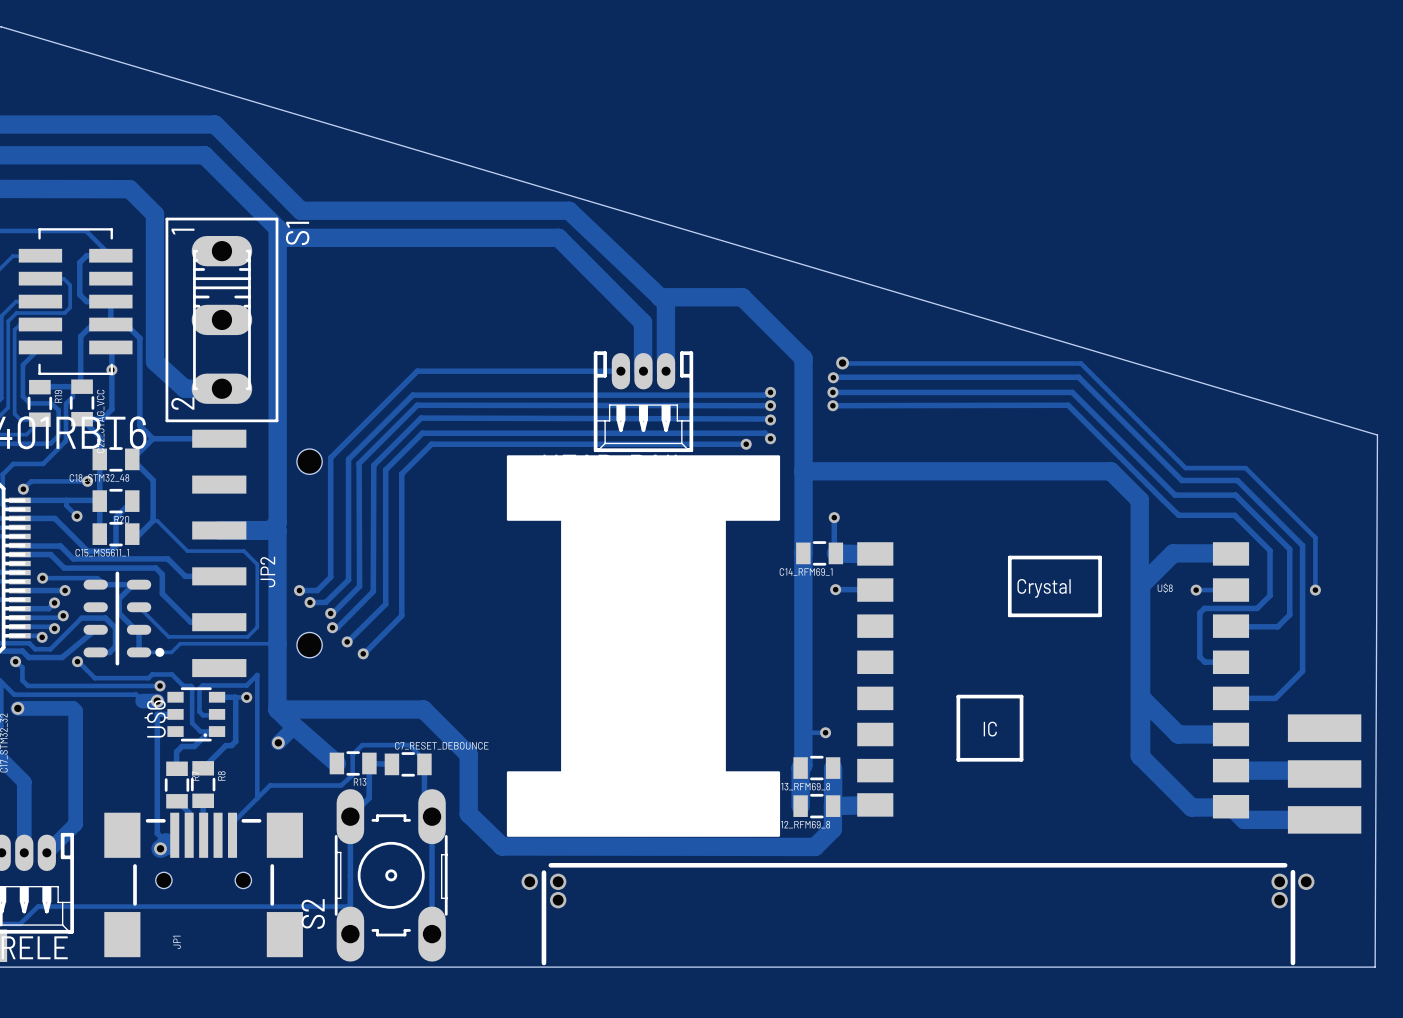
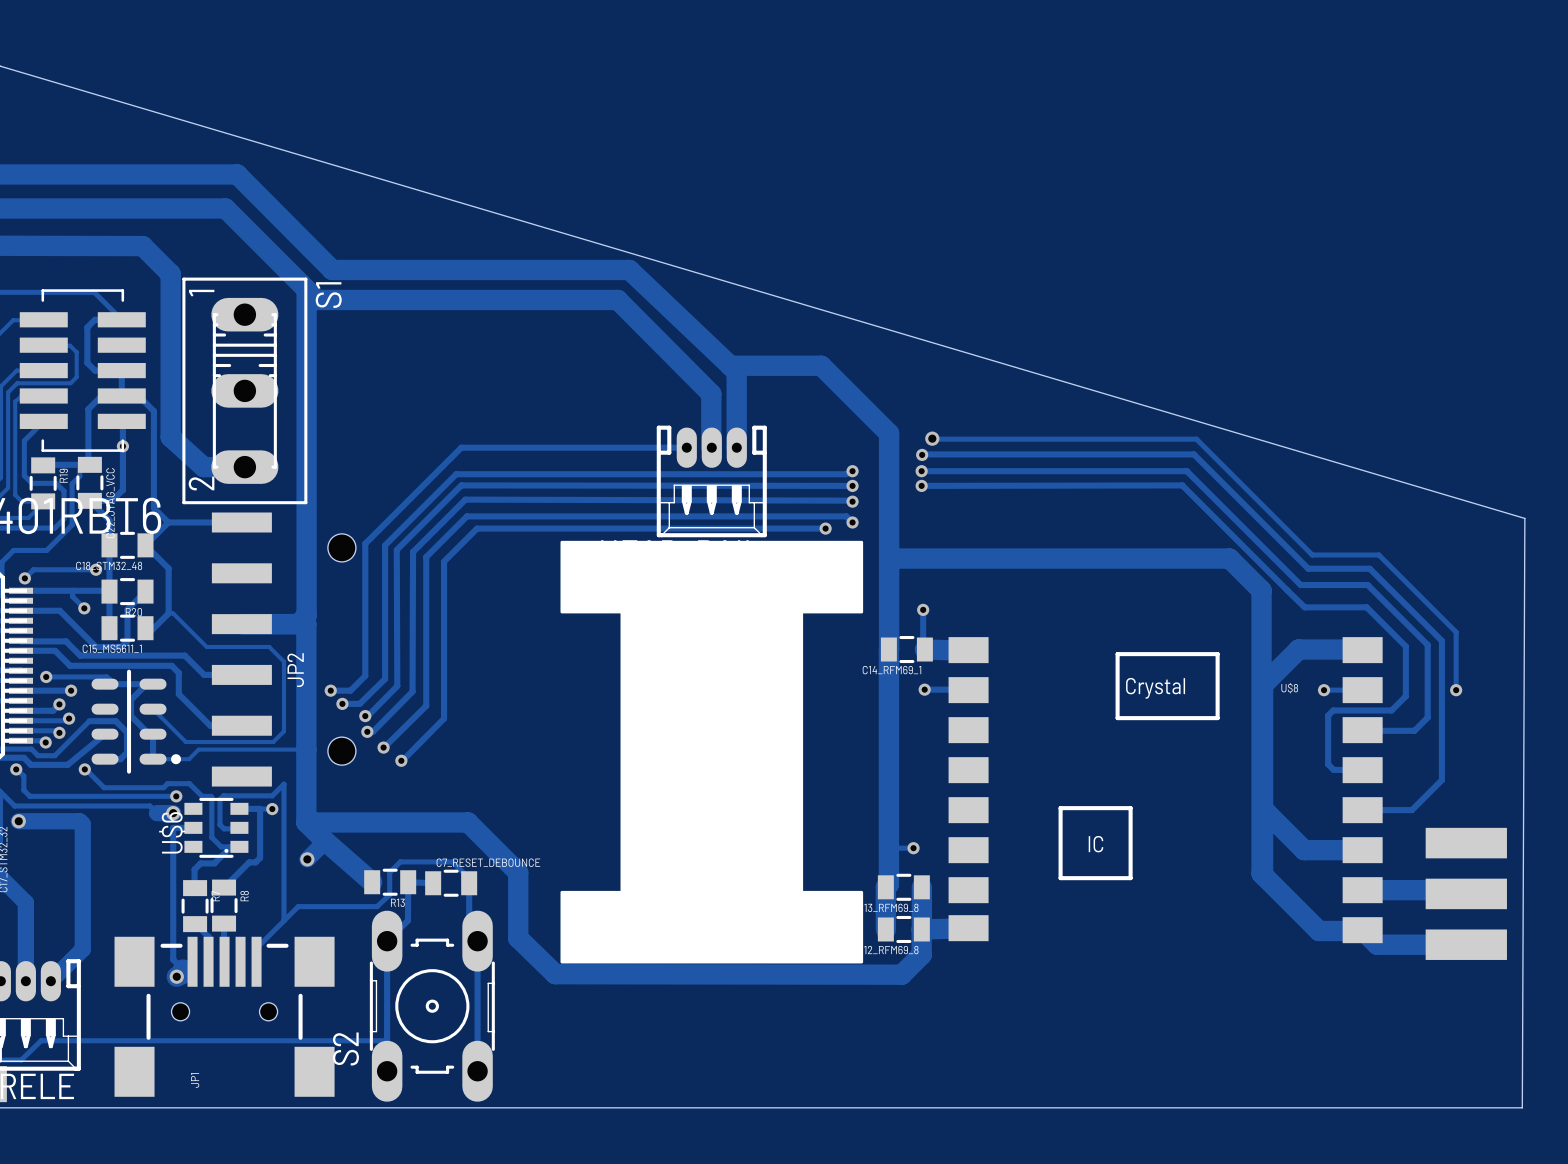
line: (550, 865) (1285, 865) -> none
line: (543, 872) (543, 962) -> none
line: (1292, 872) (1292, 962) -> none
via: (529, 881) -> none
via: (558, 881) -> none
via: (1279, 881) -> none
via: (1306, 881) -> none
via: (558, 900) -> none
via: (1279, 900) -> none

